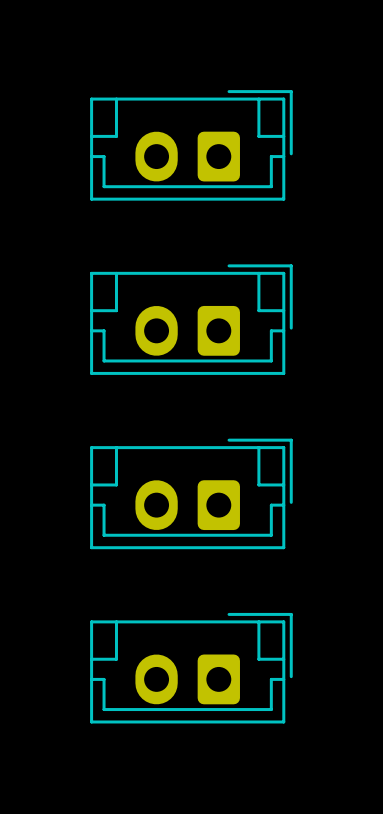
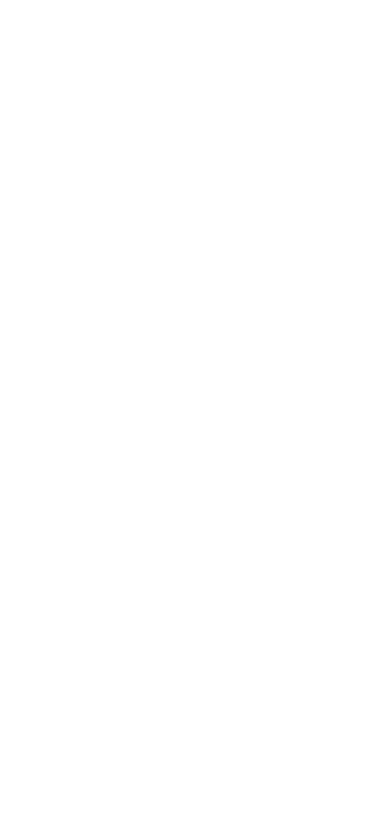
part: (191, 145) -> none
part: (191, 319) -> none
part: (191, 493) -> none
part: (191, 668) -> none

